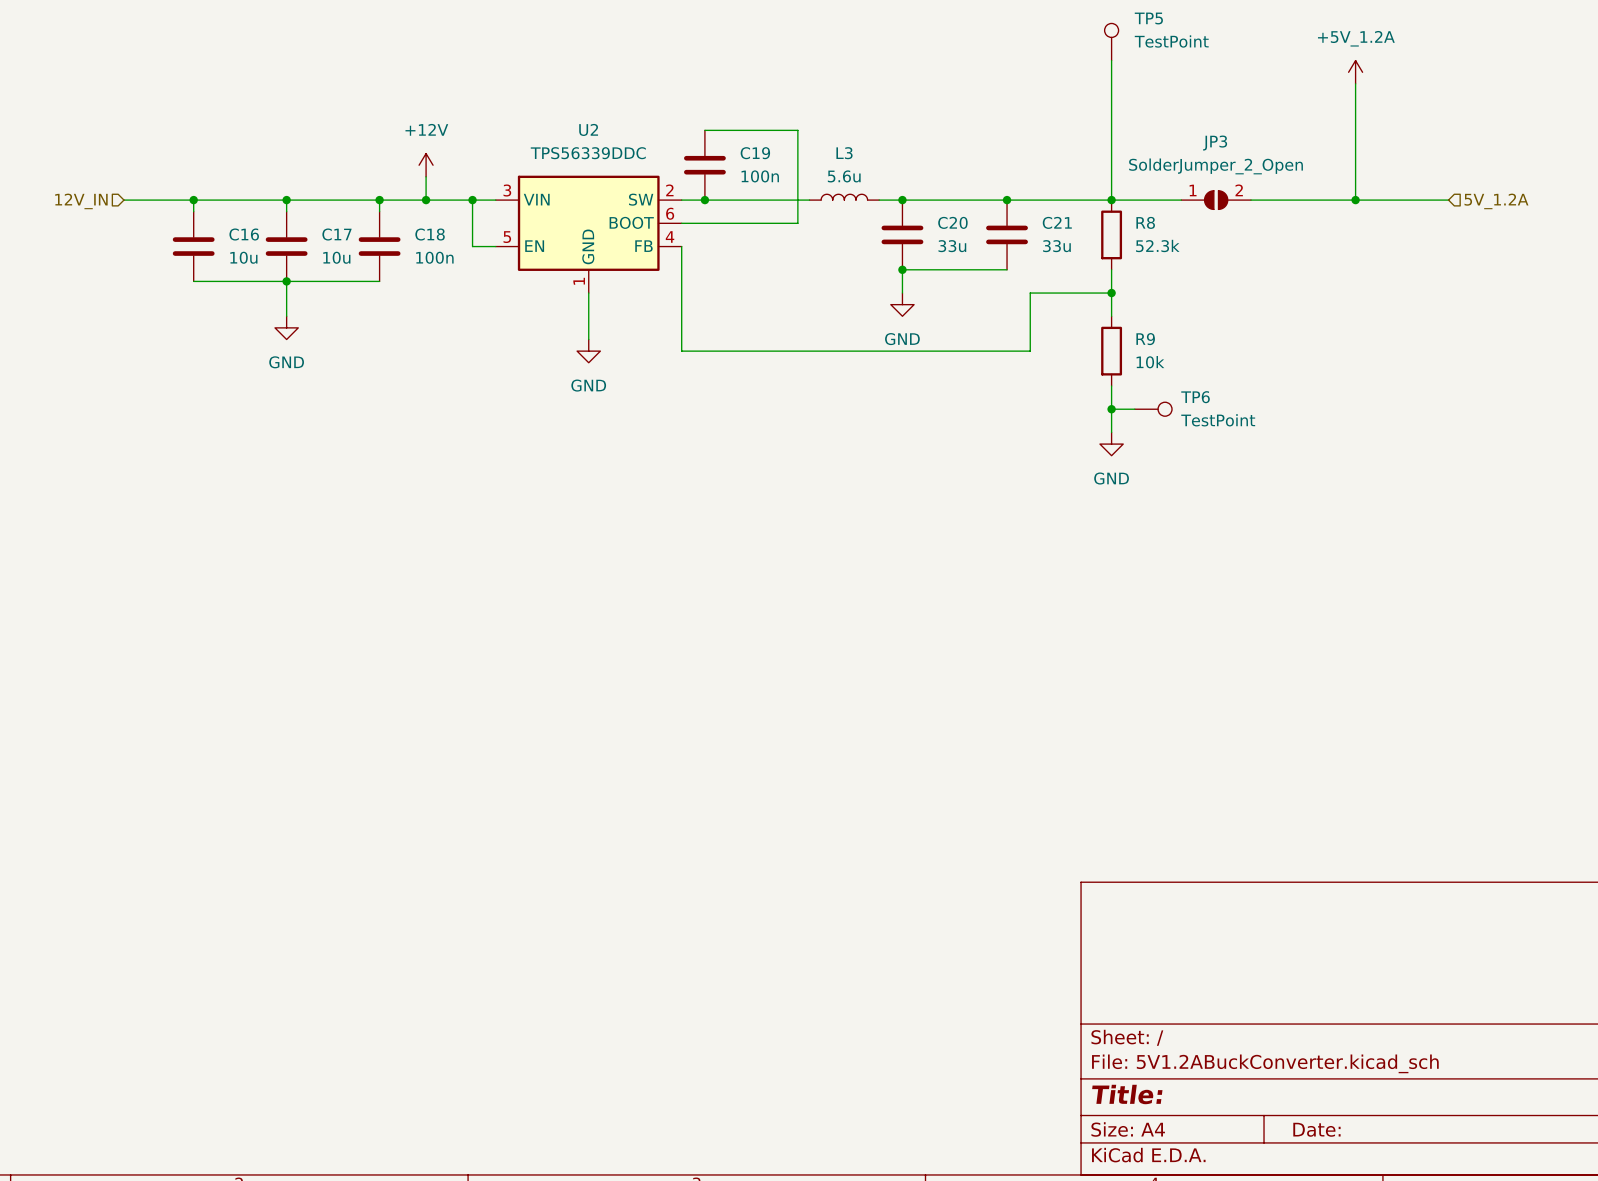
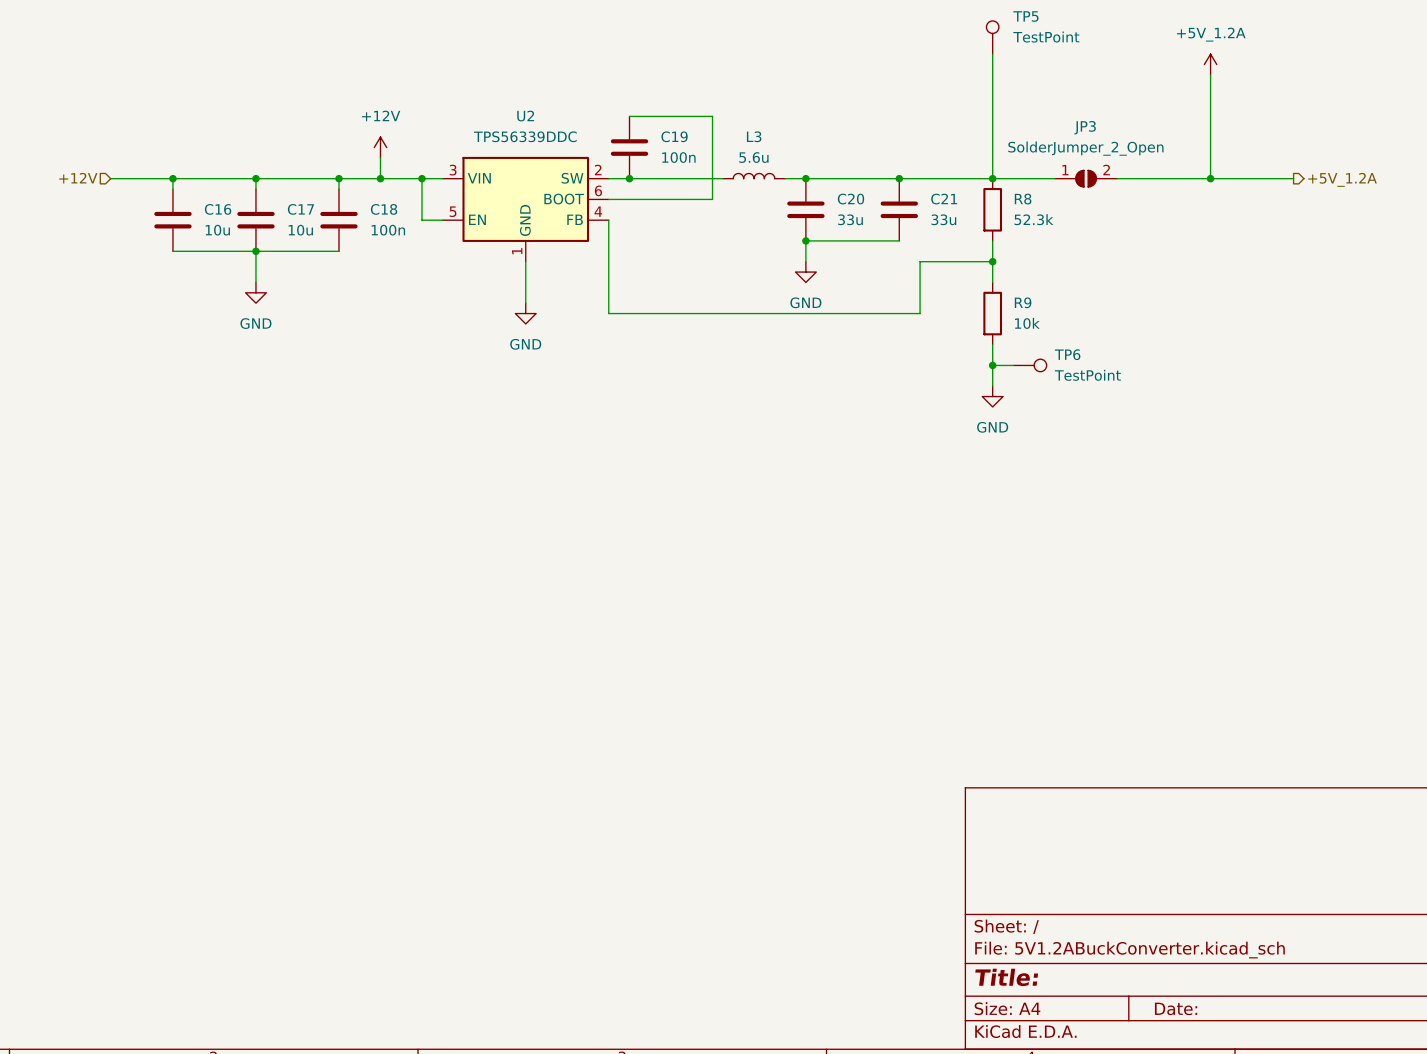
hierarchical label: 12V_IN (81, 201) -> +12V (78, 178)
hierarchical label shape: input (1496, 201) -> output (1342, 179)
hierarchical label: 5V_1.2A (1496, 201) -> +5V_1.2A (1342, 179)

